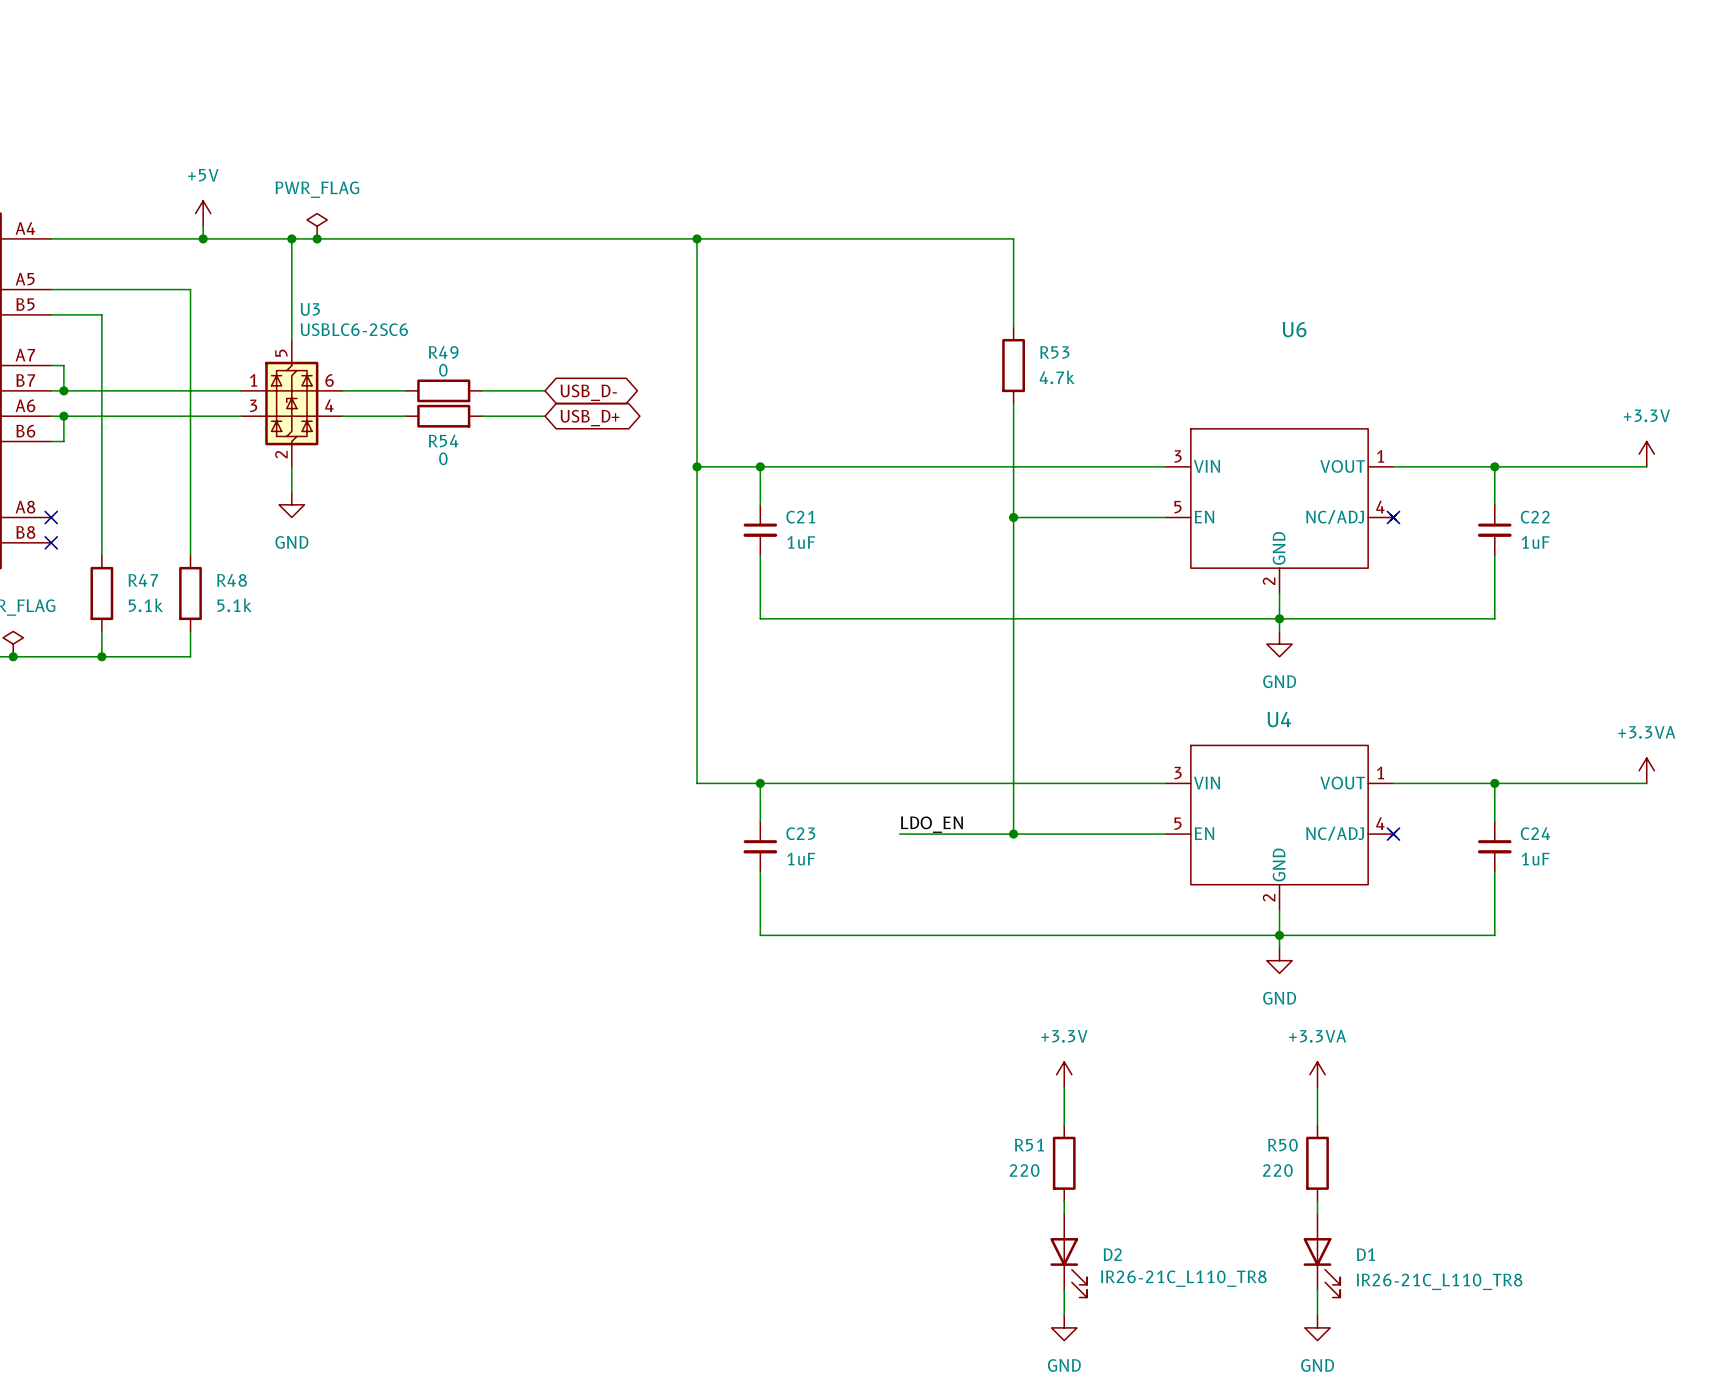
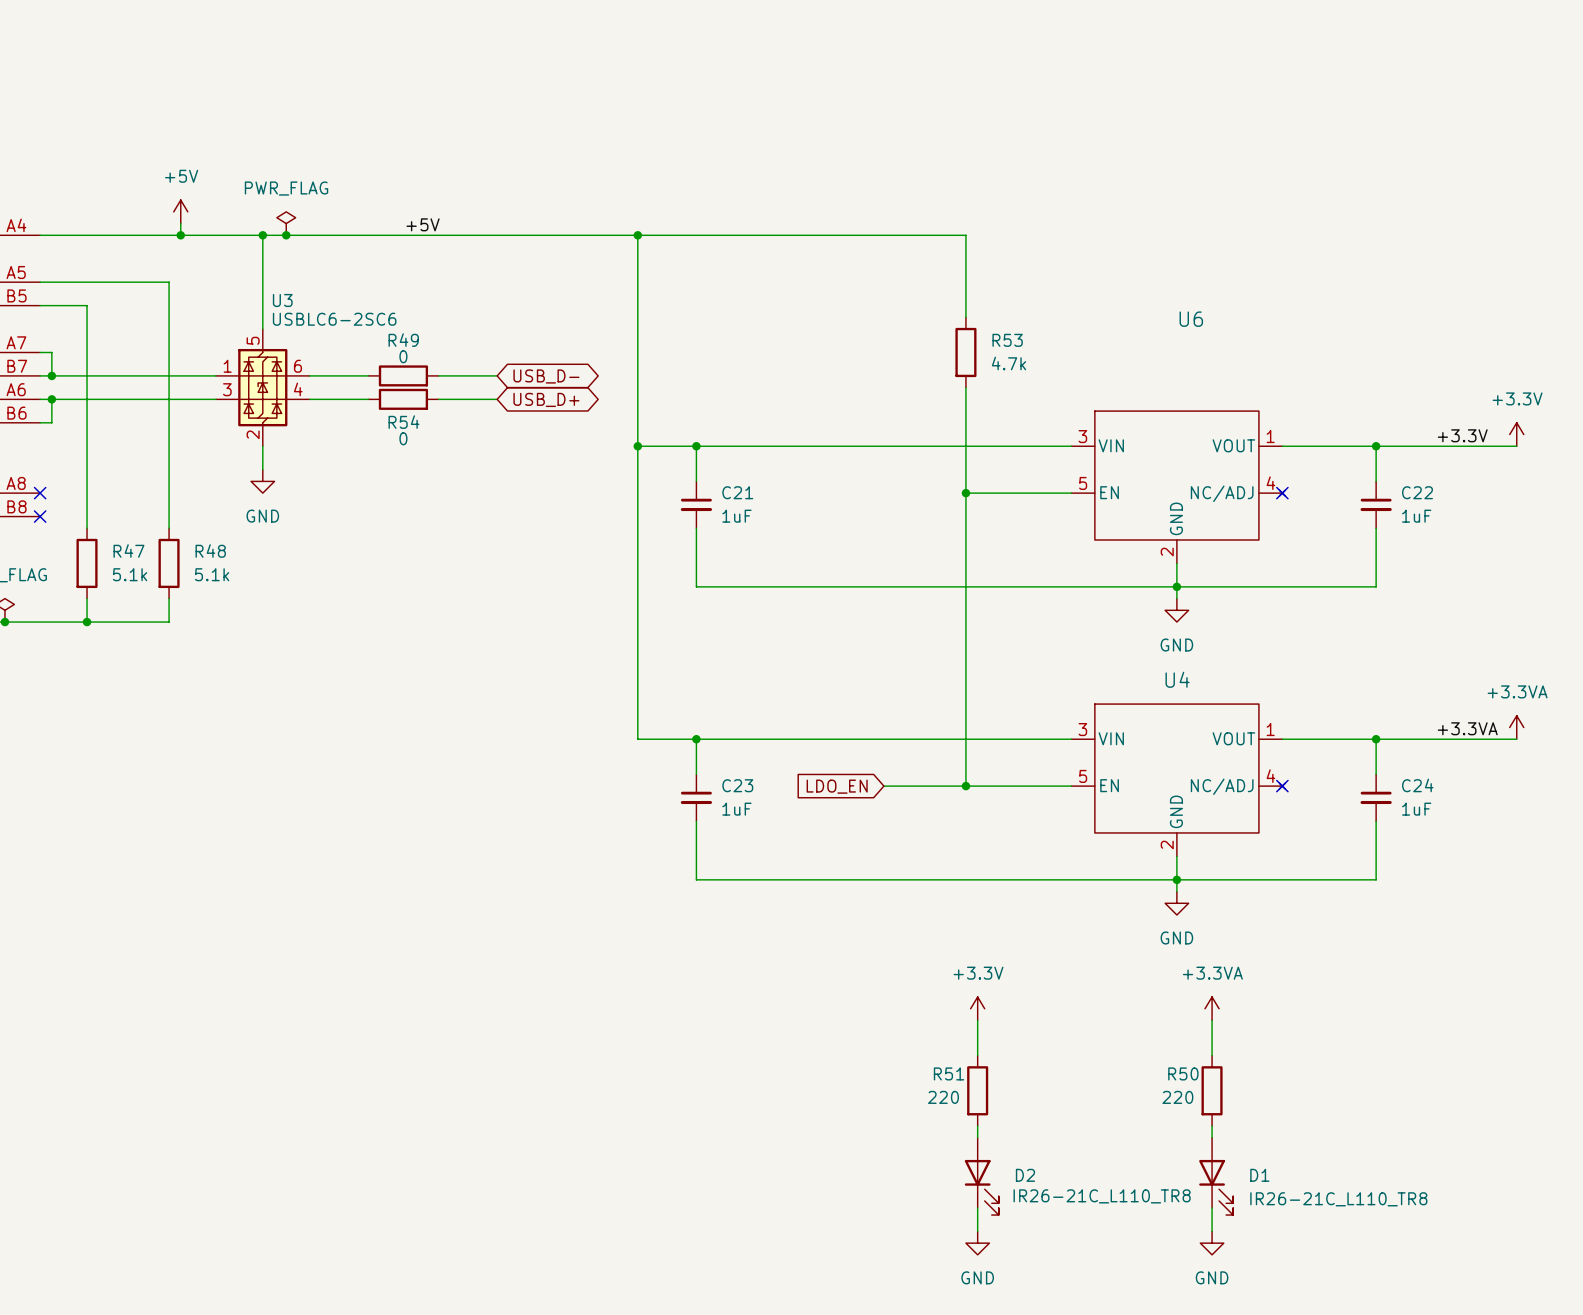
label: none -> +5V (423, 224)
wire: (1013, 238) (1013, 327) -> (930, 235) (965, 235) (965, 317)
R53 position: (1013, 365) -> (965, 352)
wire: (1013, 403) (1013, 834) -> (965, 387) (965, 786)
label: none -> +3.3V (1462, 435)
wire: (1013, 517) (1051, 517) -> none
junction position: (1013, 517) -> (965, 493)
label: none -> +3.3VA (1467, 728)
label: LDO_EN (931, 824) -> none
wire: (899, 834) (962, 834) -> none
junction position: (1013, 834) -> (965, 786)
global label: none -> LDO_EN (837, 786)

